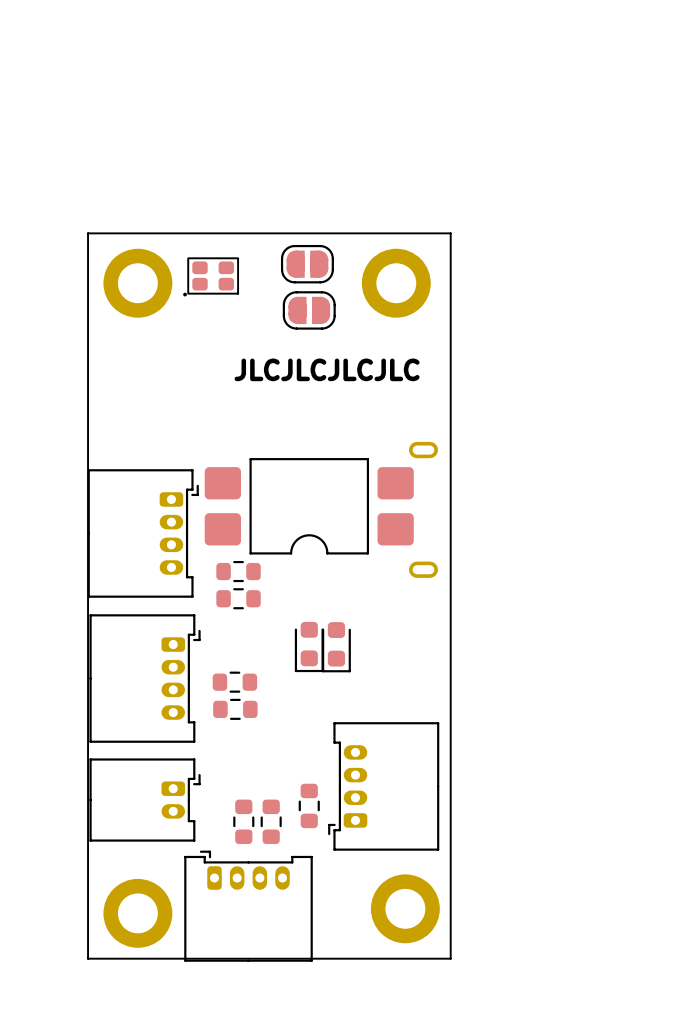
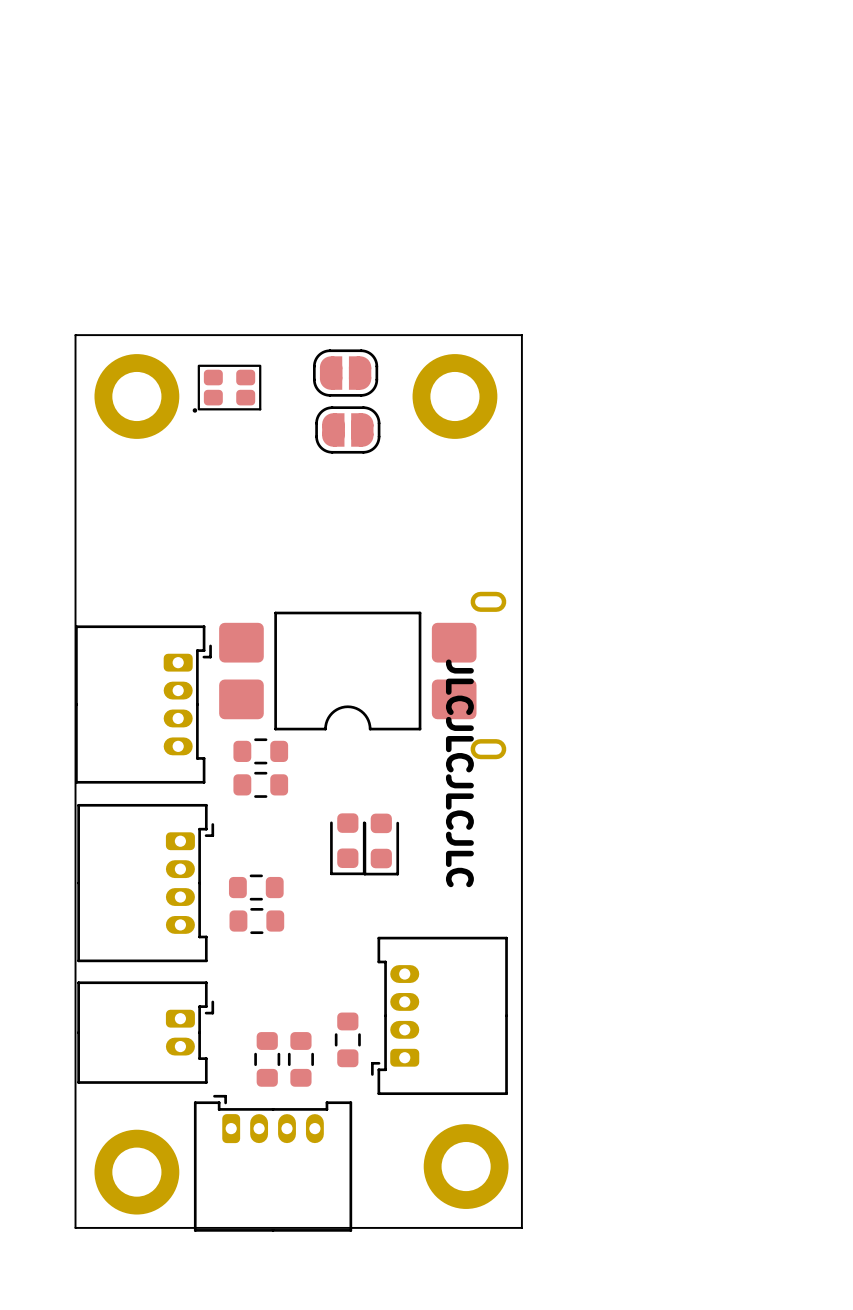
text rotation: 0° (327, 369) -> 90° clockwise (459, 773)
text position: JLCJLCJLCJLC (327, 369) -> JLCJLCJLCJLC (459, 773)

